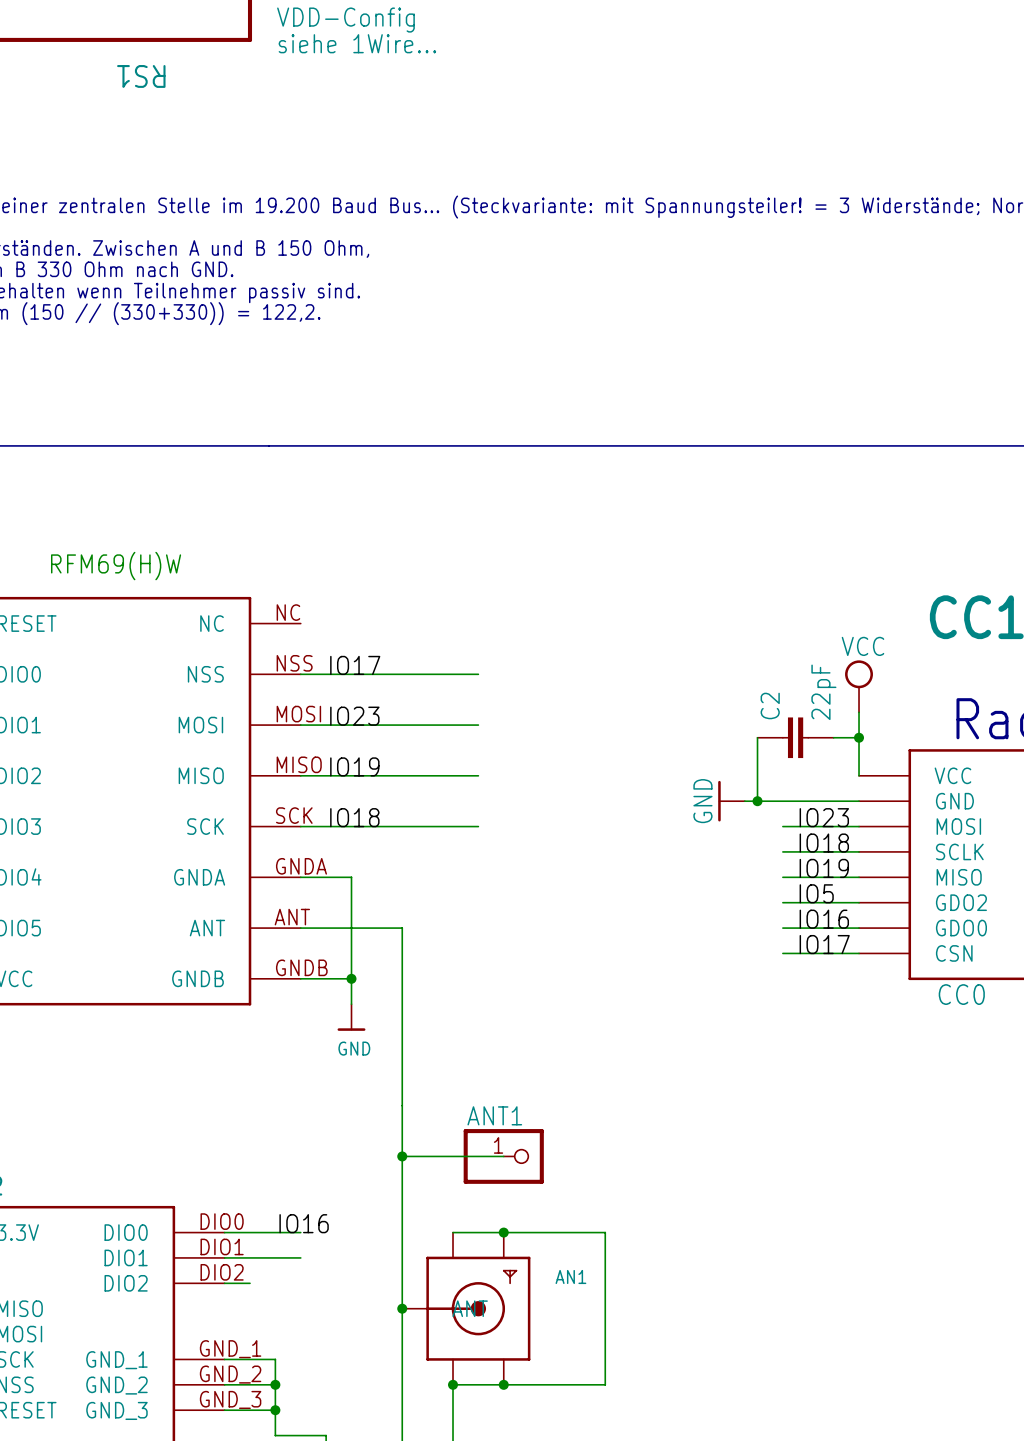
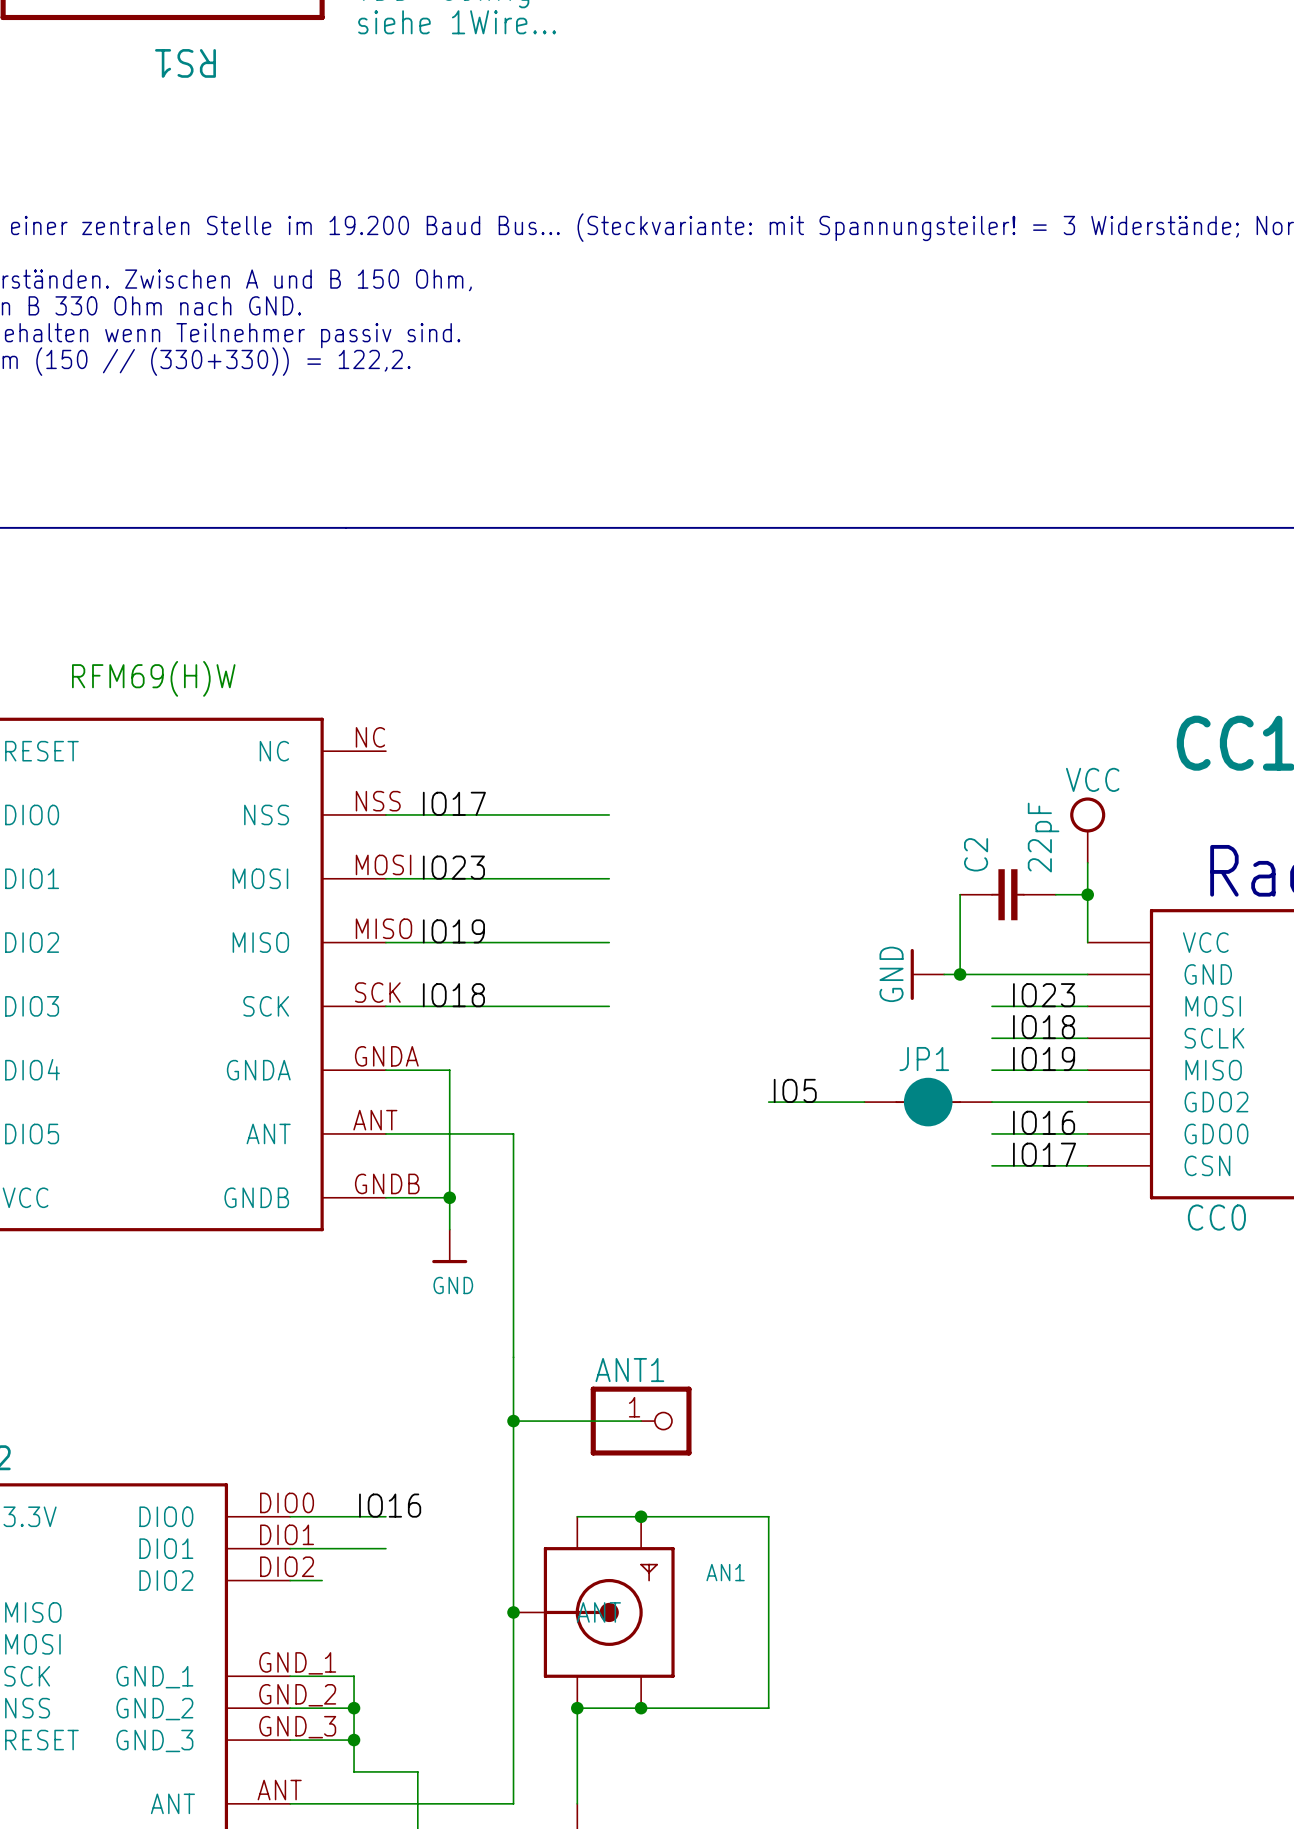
label position: IO5 (816, 893) -> IO5 (795, 1090)
wire: none -> (768, 1102) (864, 1102)
JP1: none -> (928, 1102)

